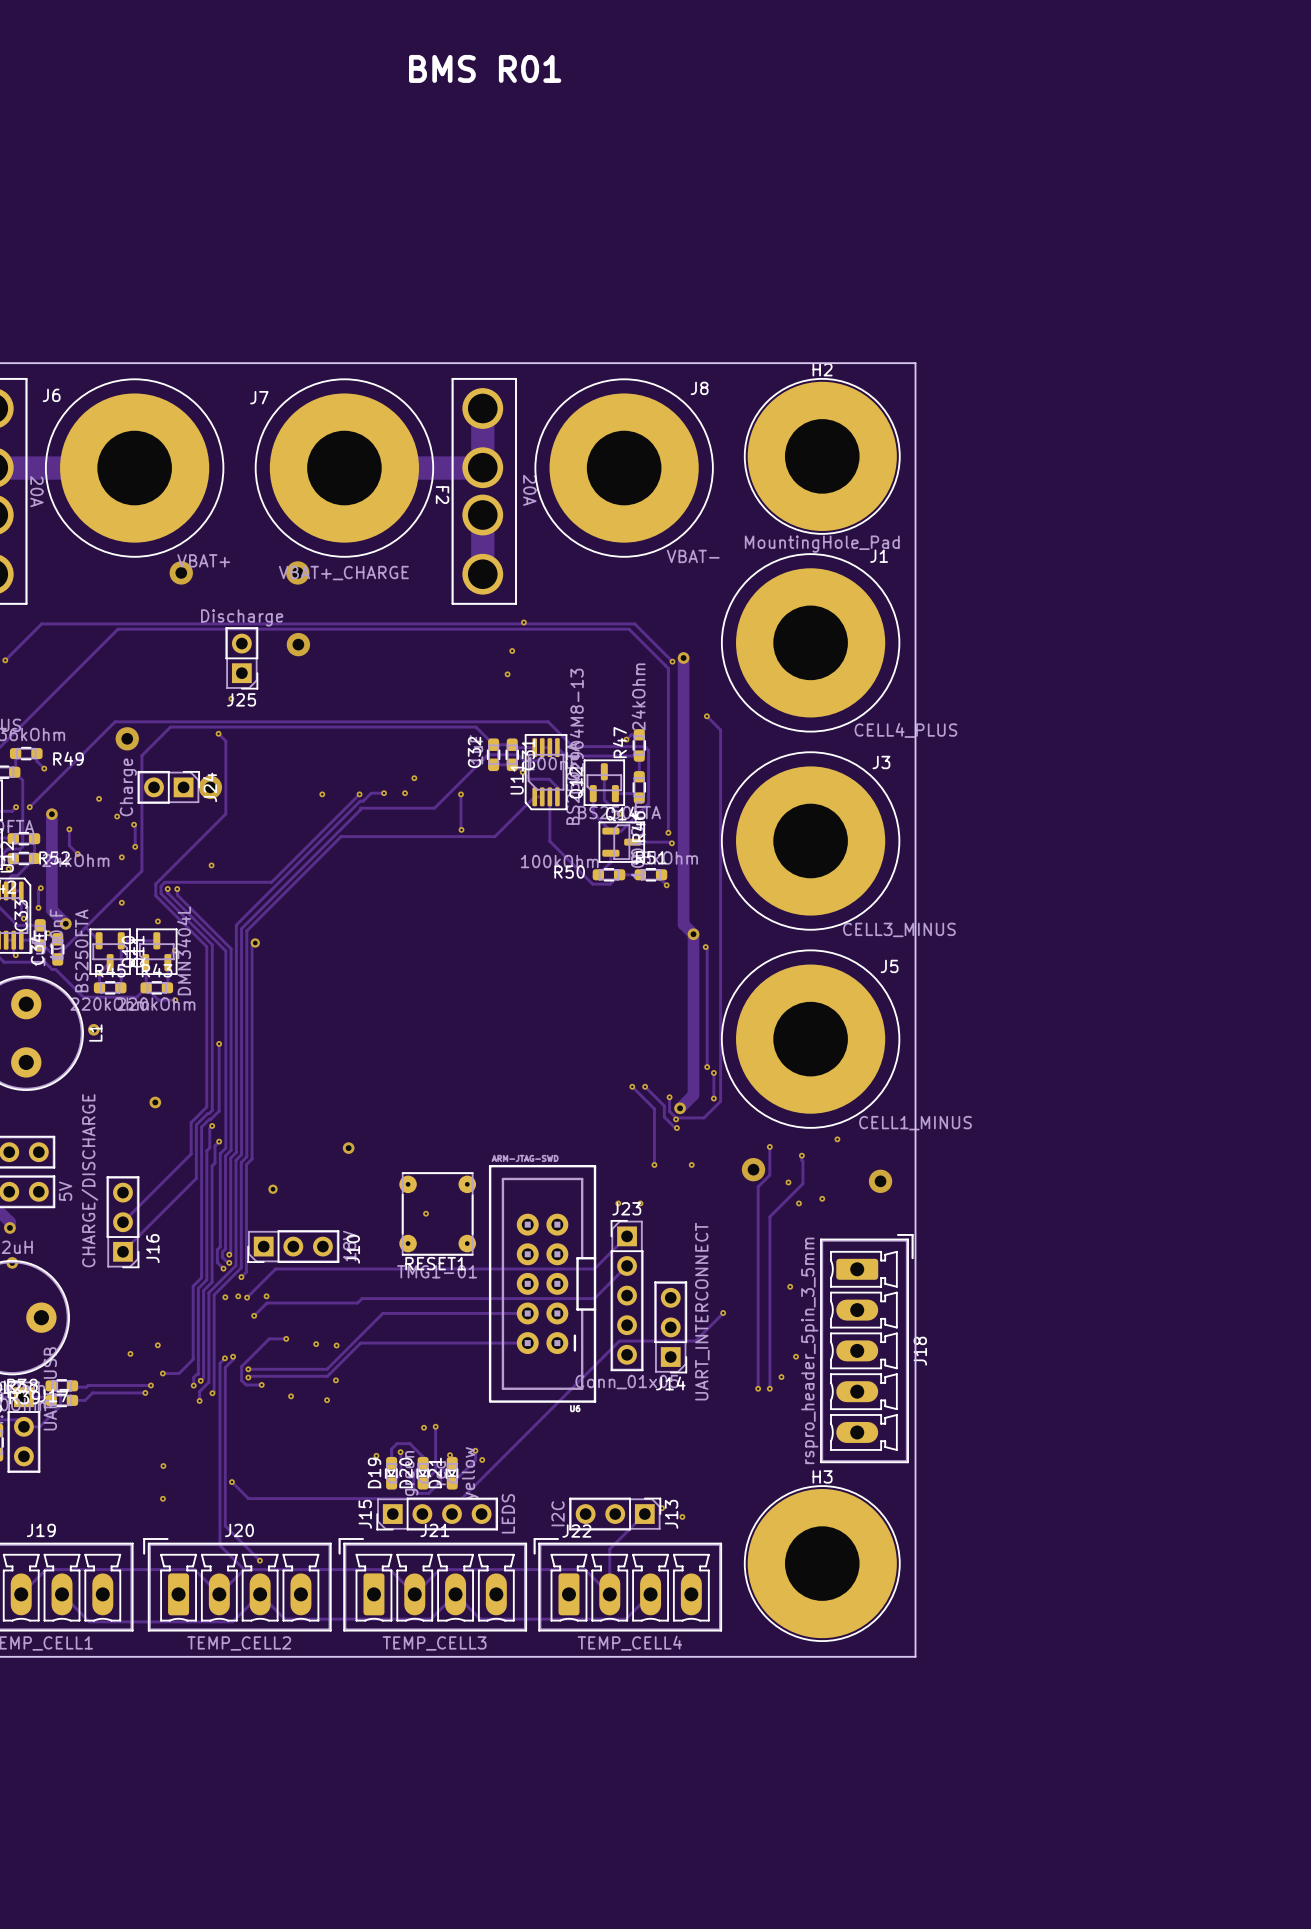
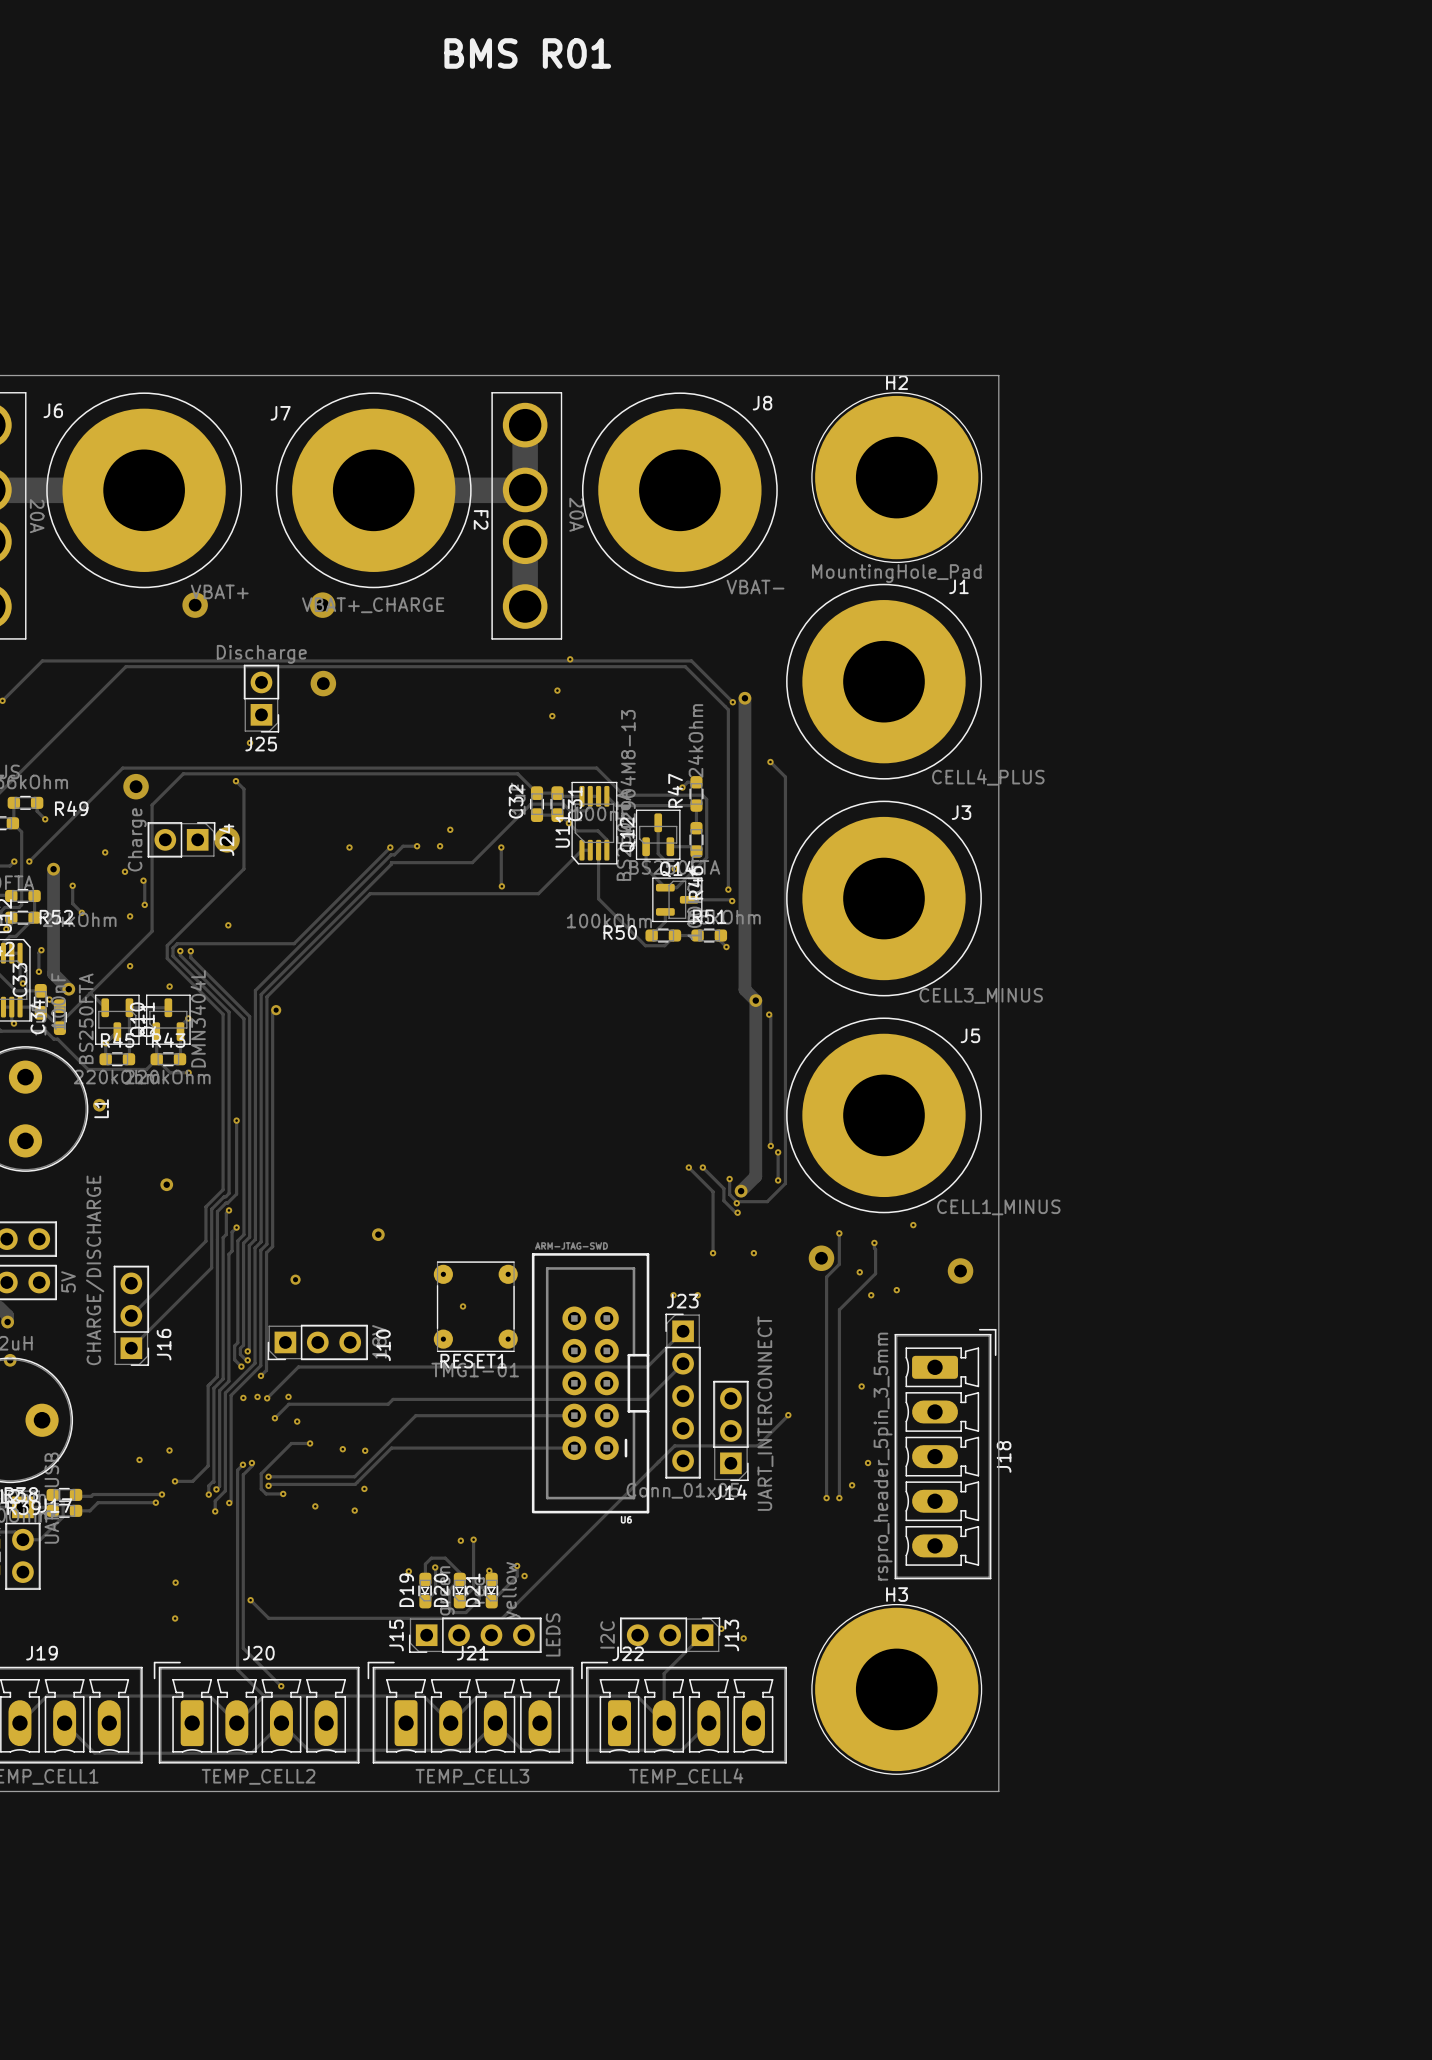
via: none -> (297, 1421)

